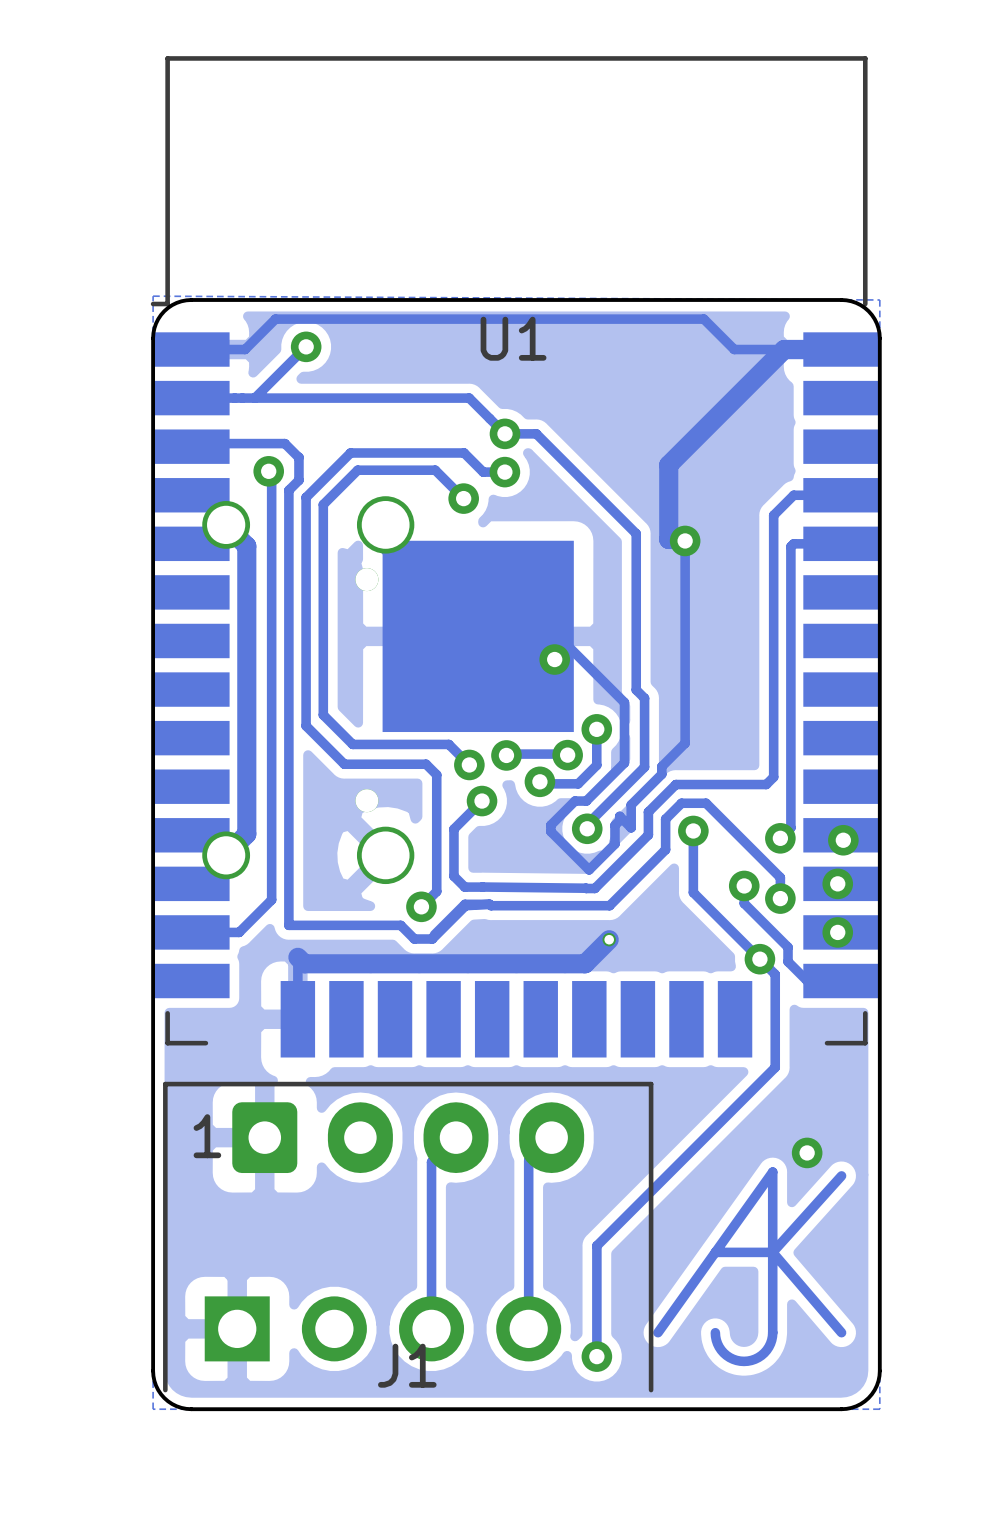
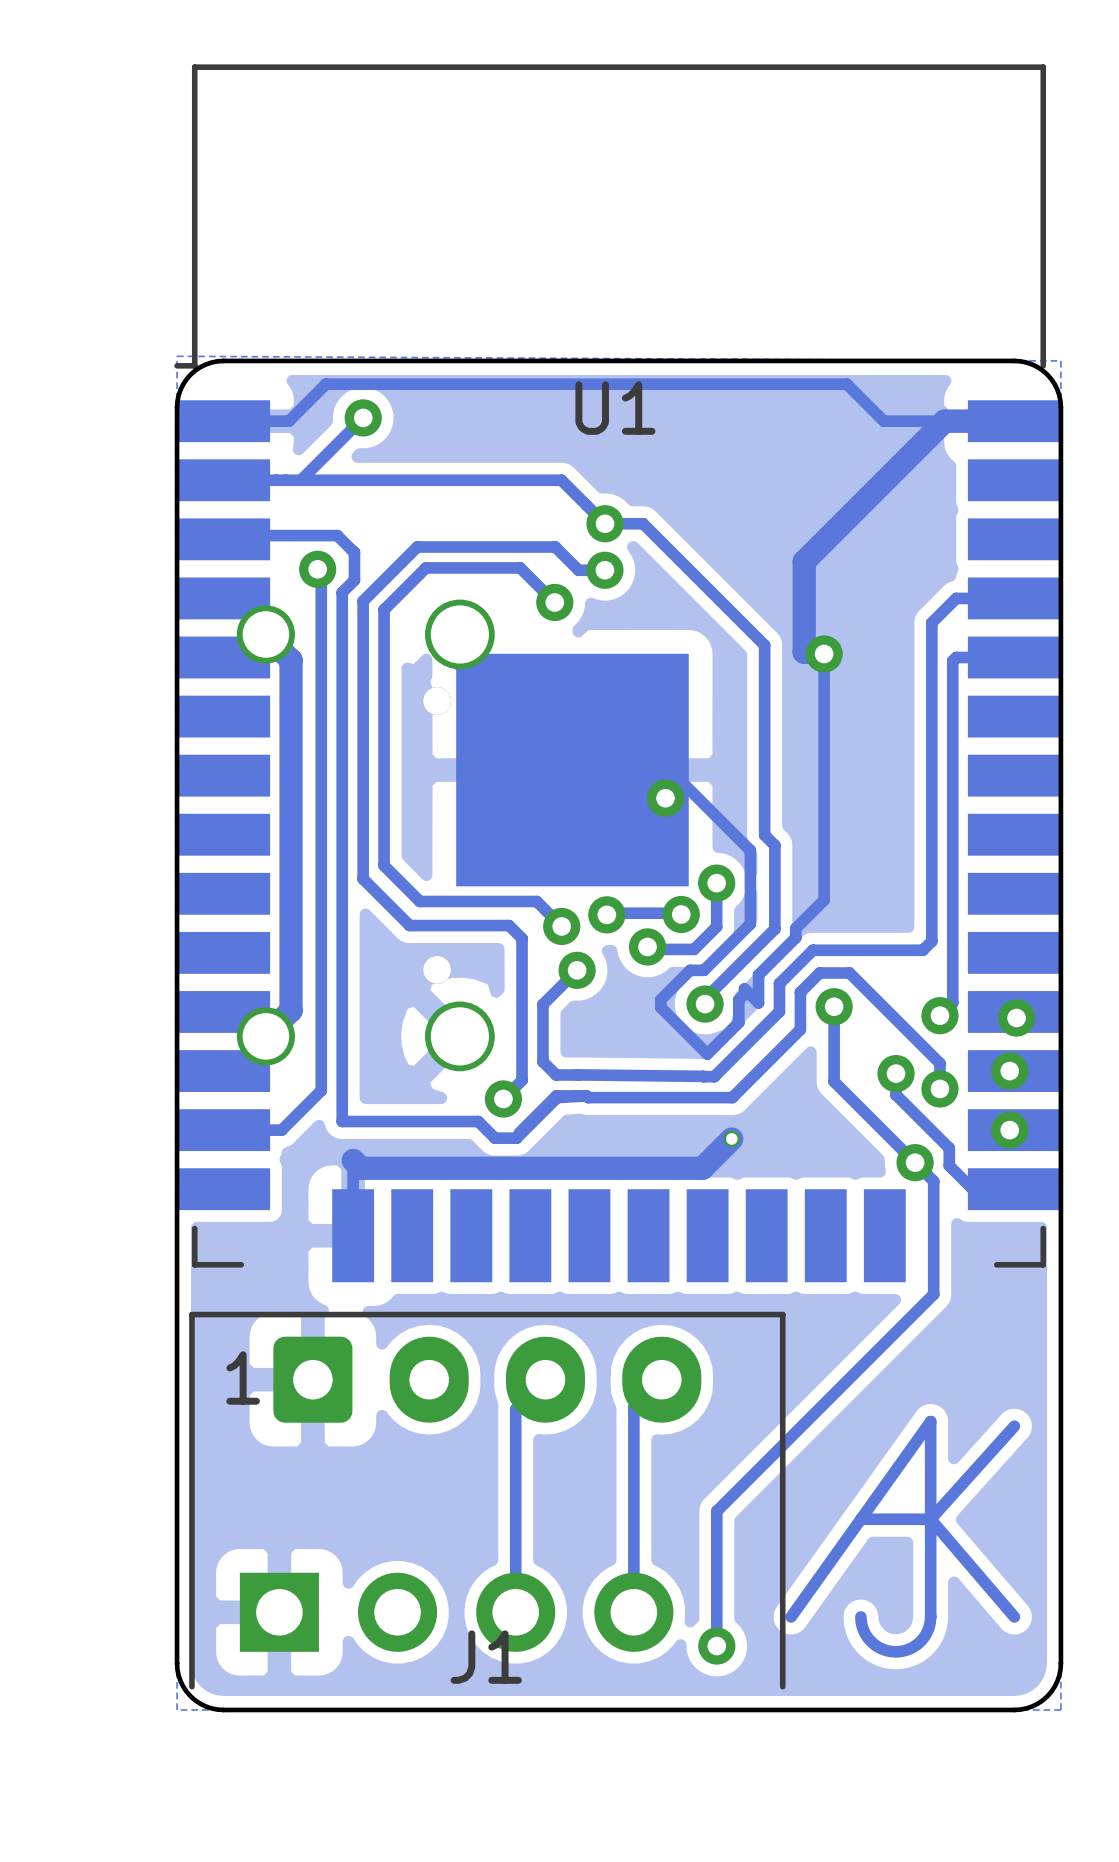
via: (807, 1152) -> none

